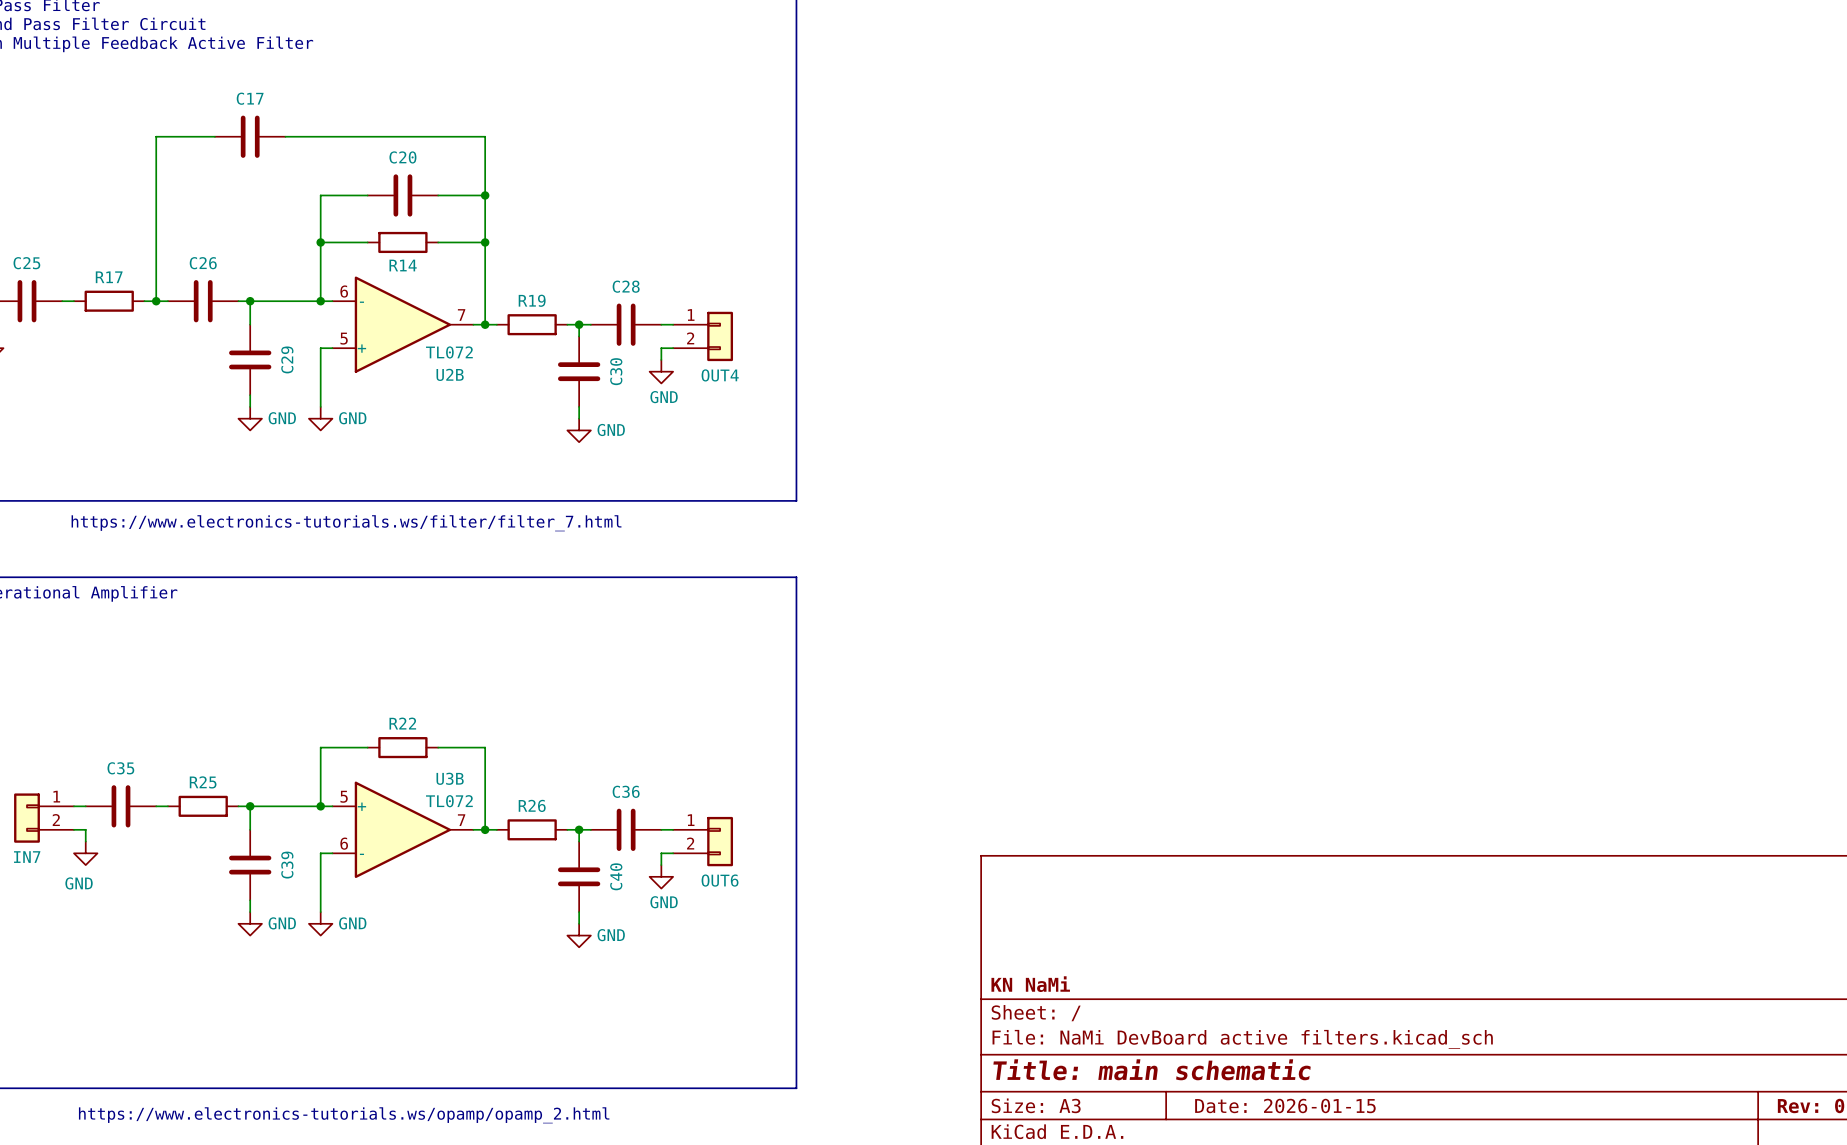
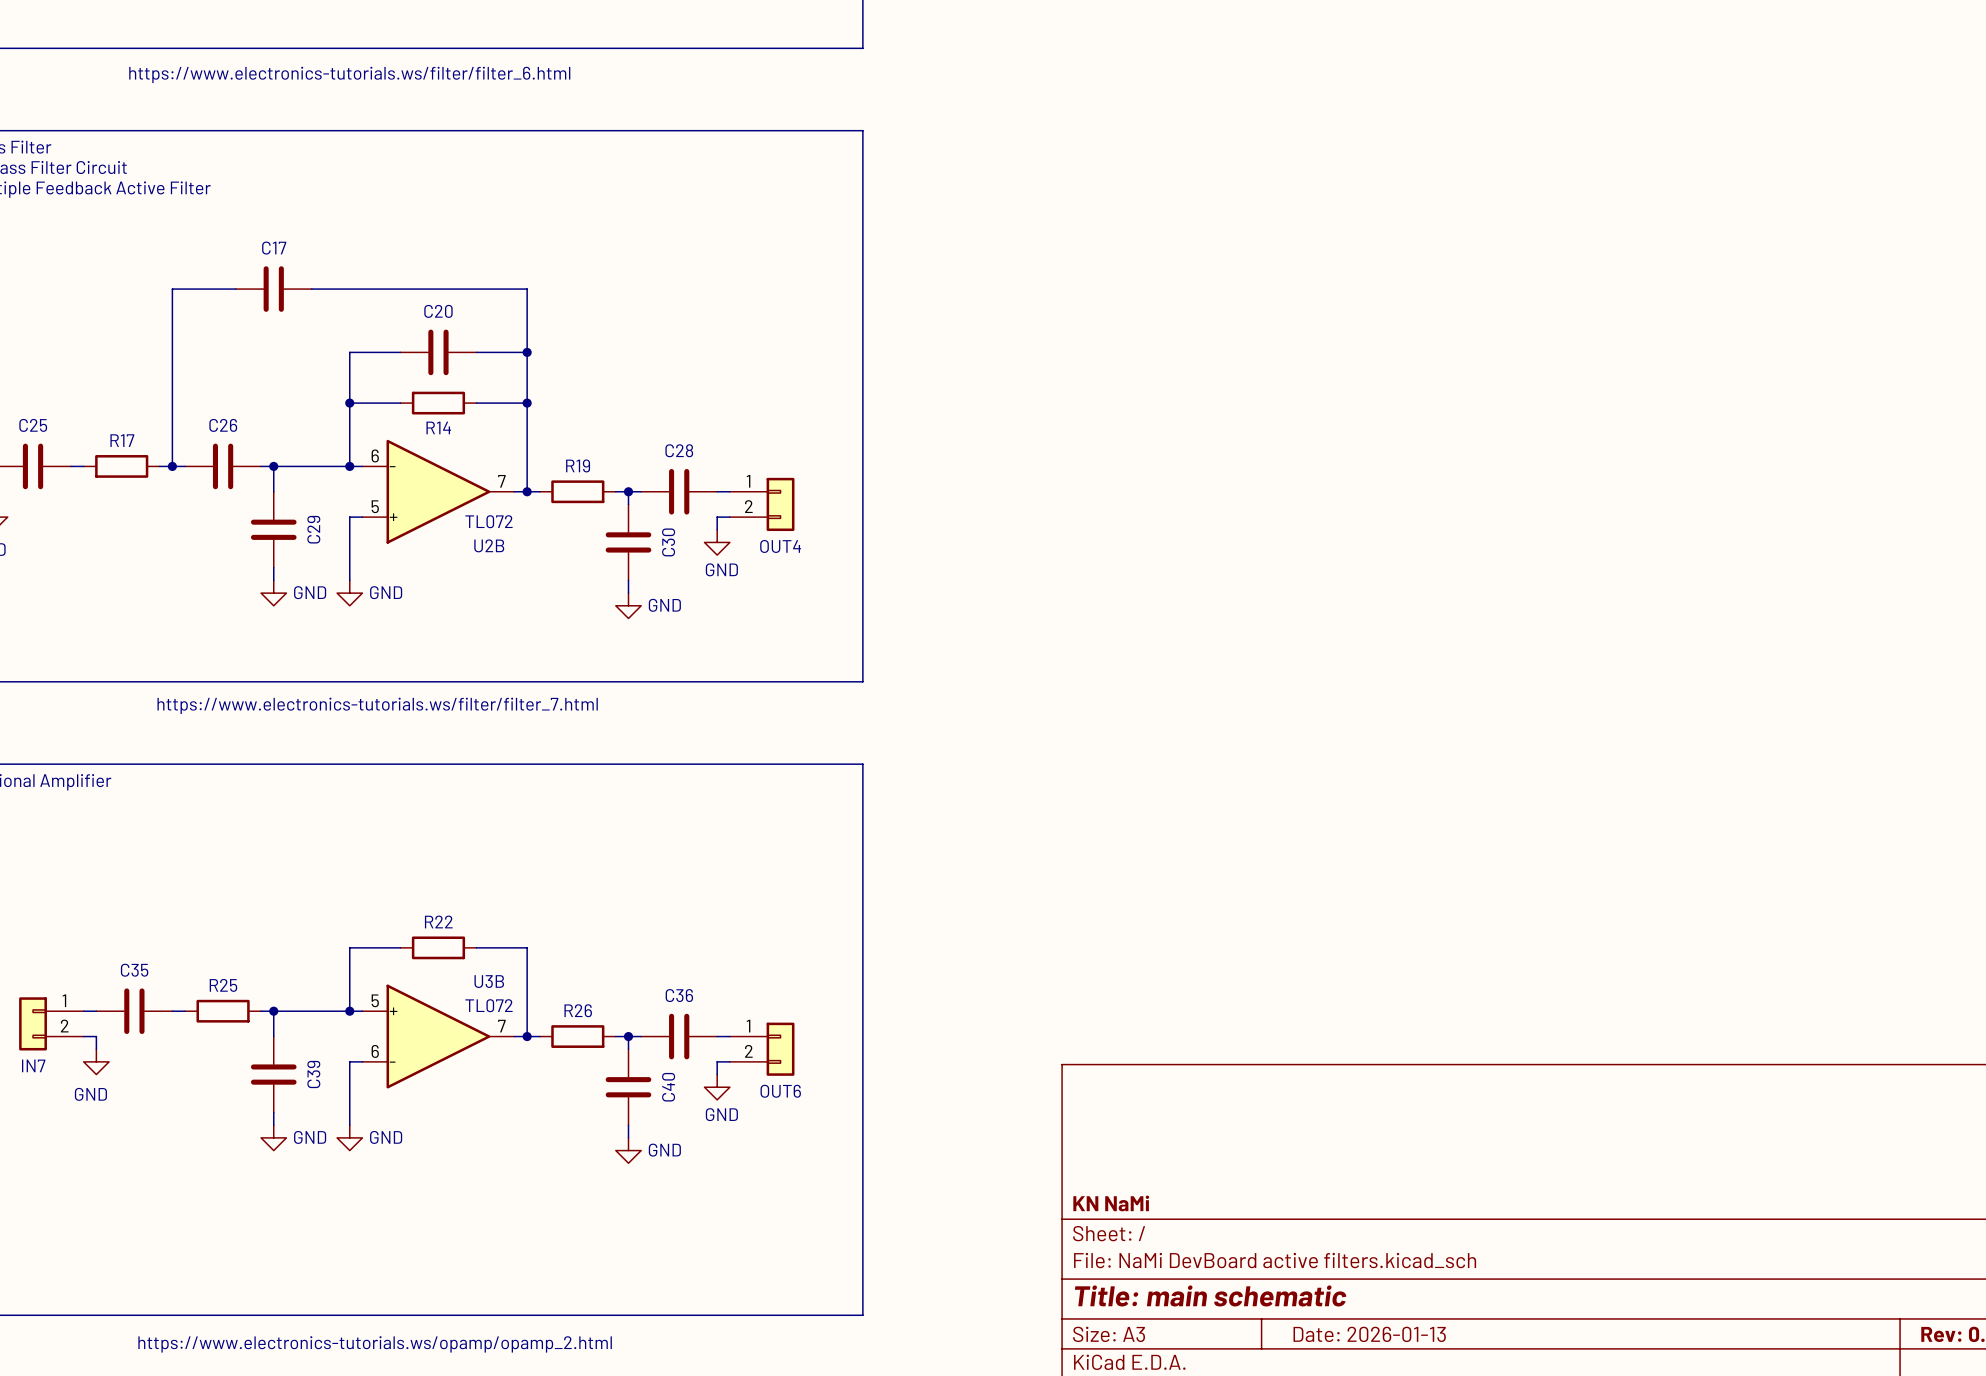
title block: Date: 2026-01-15 (1285, 1105) -> Date: 2026-01-13 (1369, 1334)

